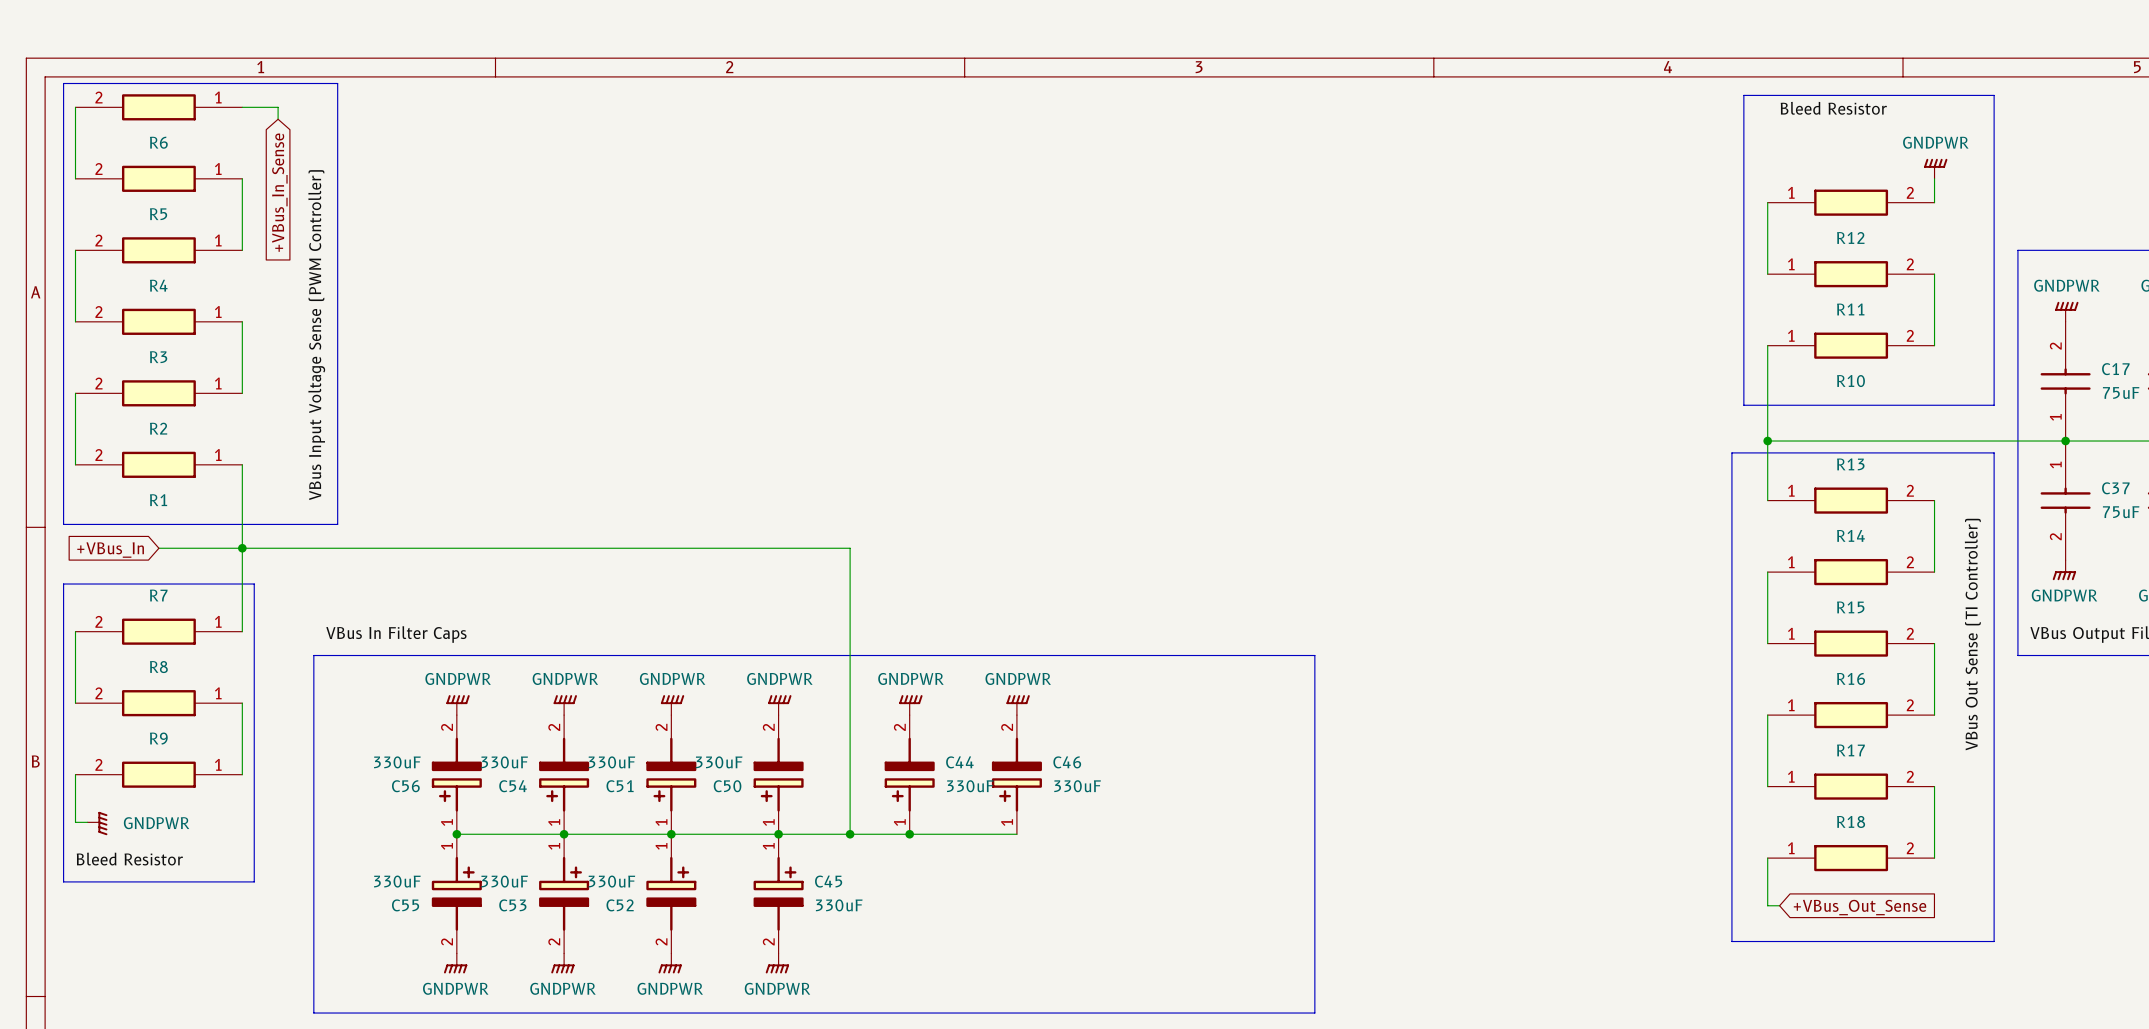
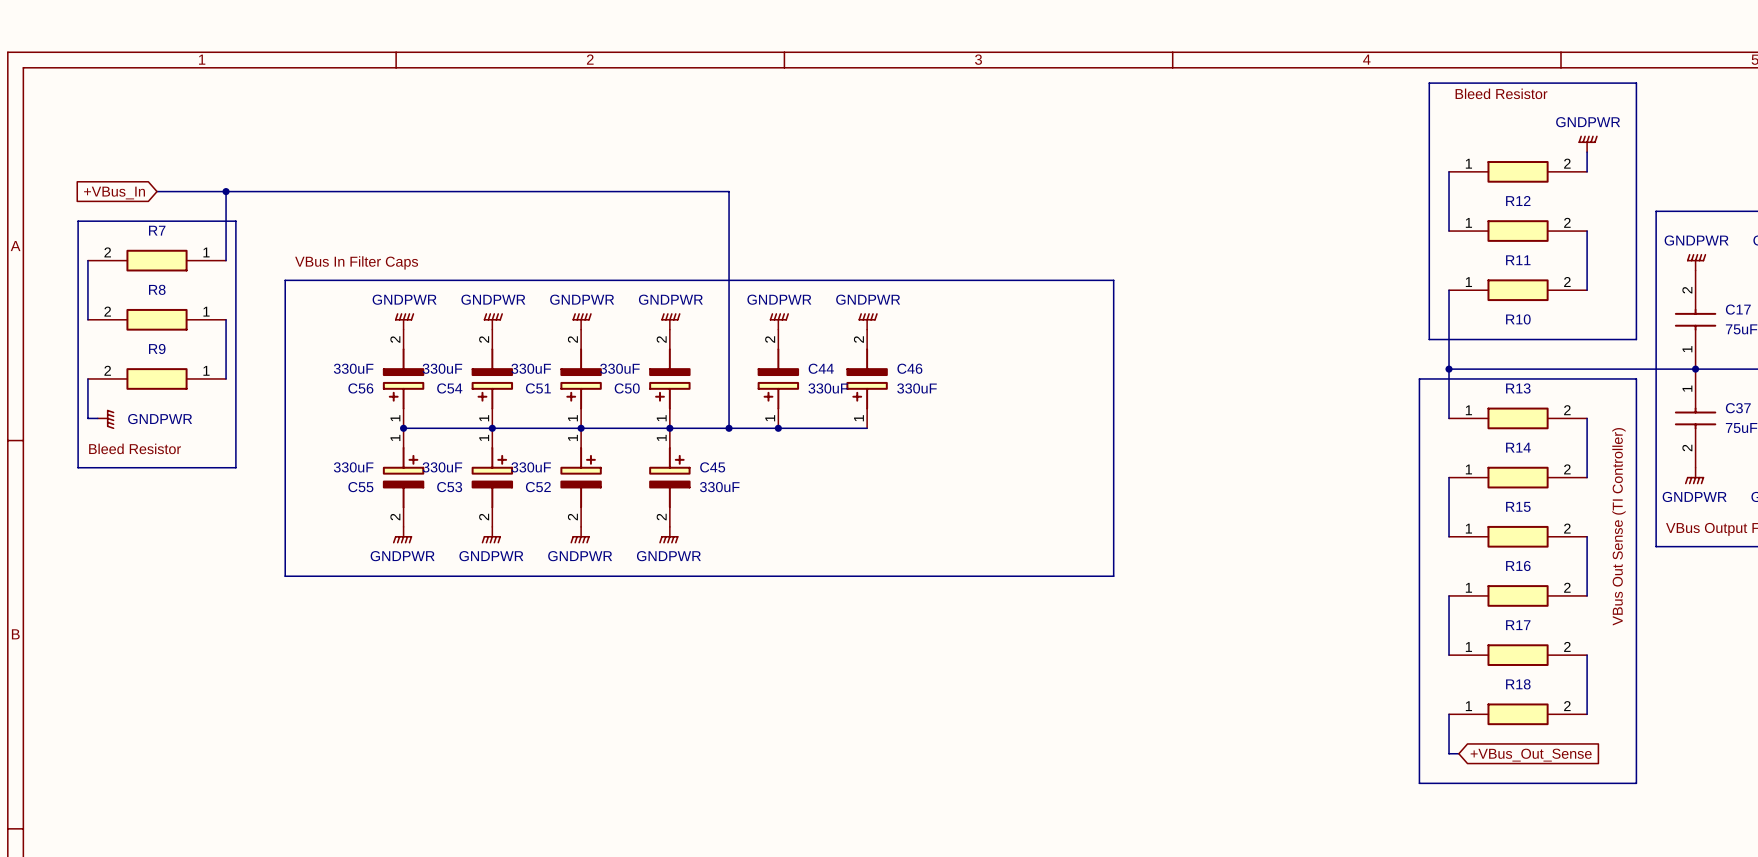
line: (63, 83) (63, 524) (337, 524) (337, 83) (63, 83) -> none
wire: (75, 107) (75, 178) -> none
R6: (158, 107) -> none
wire: (242, 107) (278, 107) (278, 119) -> none
R5: (158, 178) -> none
wire: (242, 178) (242, 250) -> none
global label: +VBus_In_Sense (279, 192) -> none
wire: none -> (157, 191) (729, 191) (729, 428)
wire: none -> (226, 191) (226, 260)
junction: none -> (226, 191)
global label: none -> +VBus_In (114, 193)
wire: (75, 250) (75, 321) -> (87, 260) (87, 319)
R4: (158, 250) -> none
line: none -> (78, 221) (235, 221) (235, 467) (78, 467) (78, 221)
label: none -> VBus In Filter Caps (356, 262)
R3: (158, 321) -> none
wire: (242, 321) (242, 393) -> (226, 319) (226, 378)
line: none -> (285, 280) (1113, 280) (1113, 576) (285, 576) (285, 280)
label: VBus Input Voltage Sense (PWM Controller) (316, 335) -> none
power symbol: none -> GNDPWR (404, 321)
power symbol: none -> GNDPWR (493, 321)
power symbol: none -> GNDPWR (582, 321)
power symbol: none -> GNDPWR (670, 321)
power symbol: none -> GNDPWR (779, 321)
power symbol: none -> GNDPWR (868, 321)
wire: (75, 393) (75, 464) -> none
R2: (158, 393) -> none
wire: none -> (87, 378) (87, 418) (97, 418)
R1: (158, 464) -> none
wire: (242, 464) (242, 631) -> none
power symbol: none -> GNDPWR (106, 419)
wire: none -> (403, 428) (867, 428)
junction: none -> (403, 428)
junction: none -> (492, 428)
junction: none -> (581, 428)
junction: none -> (669, 428)
junction: none -> (729, 428)
junction: none -> (778, 428)
label: none -> Bleed Resistor (135, 448)
wire: (158, 548) (850, 548) (850, 834) -> none
junction: (242, 548) -> none
global label: +VBus_In (110, 550) -> none
line: (63, 584) (254, 584) (254, 881) (63, 881) (63, 584) -> none
wire: (75, 631) (75, 703) -> none
R7 position: (158, 631) -> (157, 260)
label: VBus In Filter Caps (396, 634) -> none
power symbol: none -> GNDPWR (402, 535)
power symbol: none -> GNDPWR (491, 535)
power symbol: none -> GNDPWR (580, 535)
power symbol: none -> GNDPWR (668, 535)
line: (313, 655) (1314, 655) (1314, 1013) (313, 1013) (313, 655) -> none
R8 position: (158, 703) -> (157, 319)
wire: (242, 703) (242, 774) -> none
power symbol: GNDPWR (458, 705) -> none
power symbol: GNDPWR (565, 705) -> none
power symbol: GNDPWR (672, 705) -> none
power symbol: GNDPWR (779, 705) -> none
power symbol: GNDPWR (910, 705) -> none
power symbol: GNDPWR (1018, 705) -> none
wire: (75, 774) (75, 822) (87, 822) -> none
R9 position: (158, 774) -> (157, 378)
C56 position: (456, 774) -> (403, 378)
C54 position: (564, 774) -> (492, 378)
C51 position: (671, 774) -> (581, 378)
C50 position: (778, 774) -> (669, 378)
C44 position: (909, 774) -> (778, 378)
C46 position: (1016, 774) -> (867, 378)
power symbol: GNDPWR (97, 823) -> none
wire: (456, 834) (1016, 834) -> none
junction: (456, 834) -> none
junction: (564, 834) -> none
junction: (671, 834) -> none
junction: (778, 834) -> none
junction: (850, 834) -> none
junction: (909, 834) -> none
label: Bleed Resistor (129, 859) -> none
C55 position: (456, 893) -> (403, 477)
C53 position: (564, 893) -> (492, 477)
C52 position: (671, 893) -> (581, 477)
C45 position: (778, 893) -> (669, 477)
power symbol: GNDPWR (455, 963) -> none
power symbol: GNDPWR (562, 963) -> none
power symbol: GNDPWR (670, 963) -> none
power symbol: GNDPWR (777, 963) -> none

